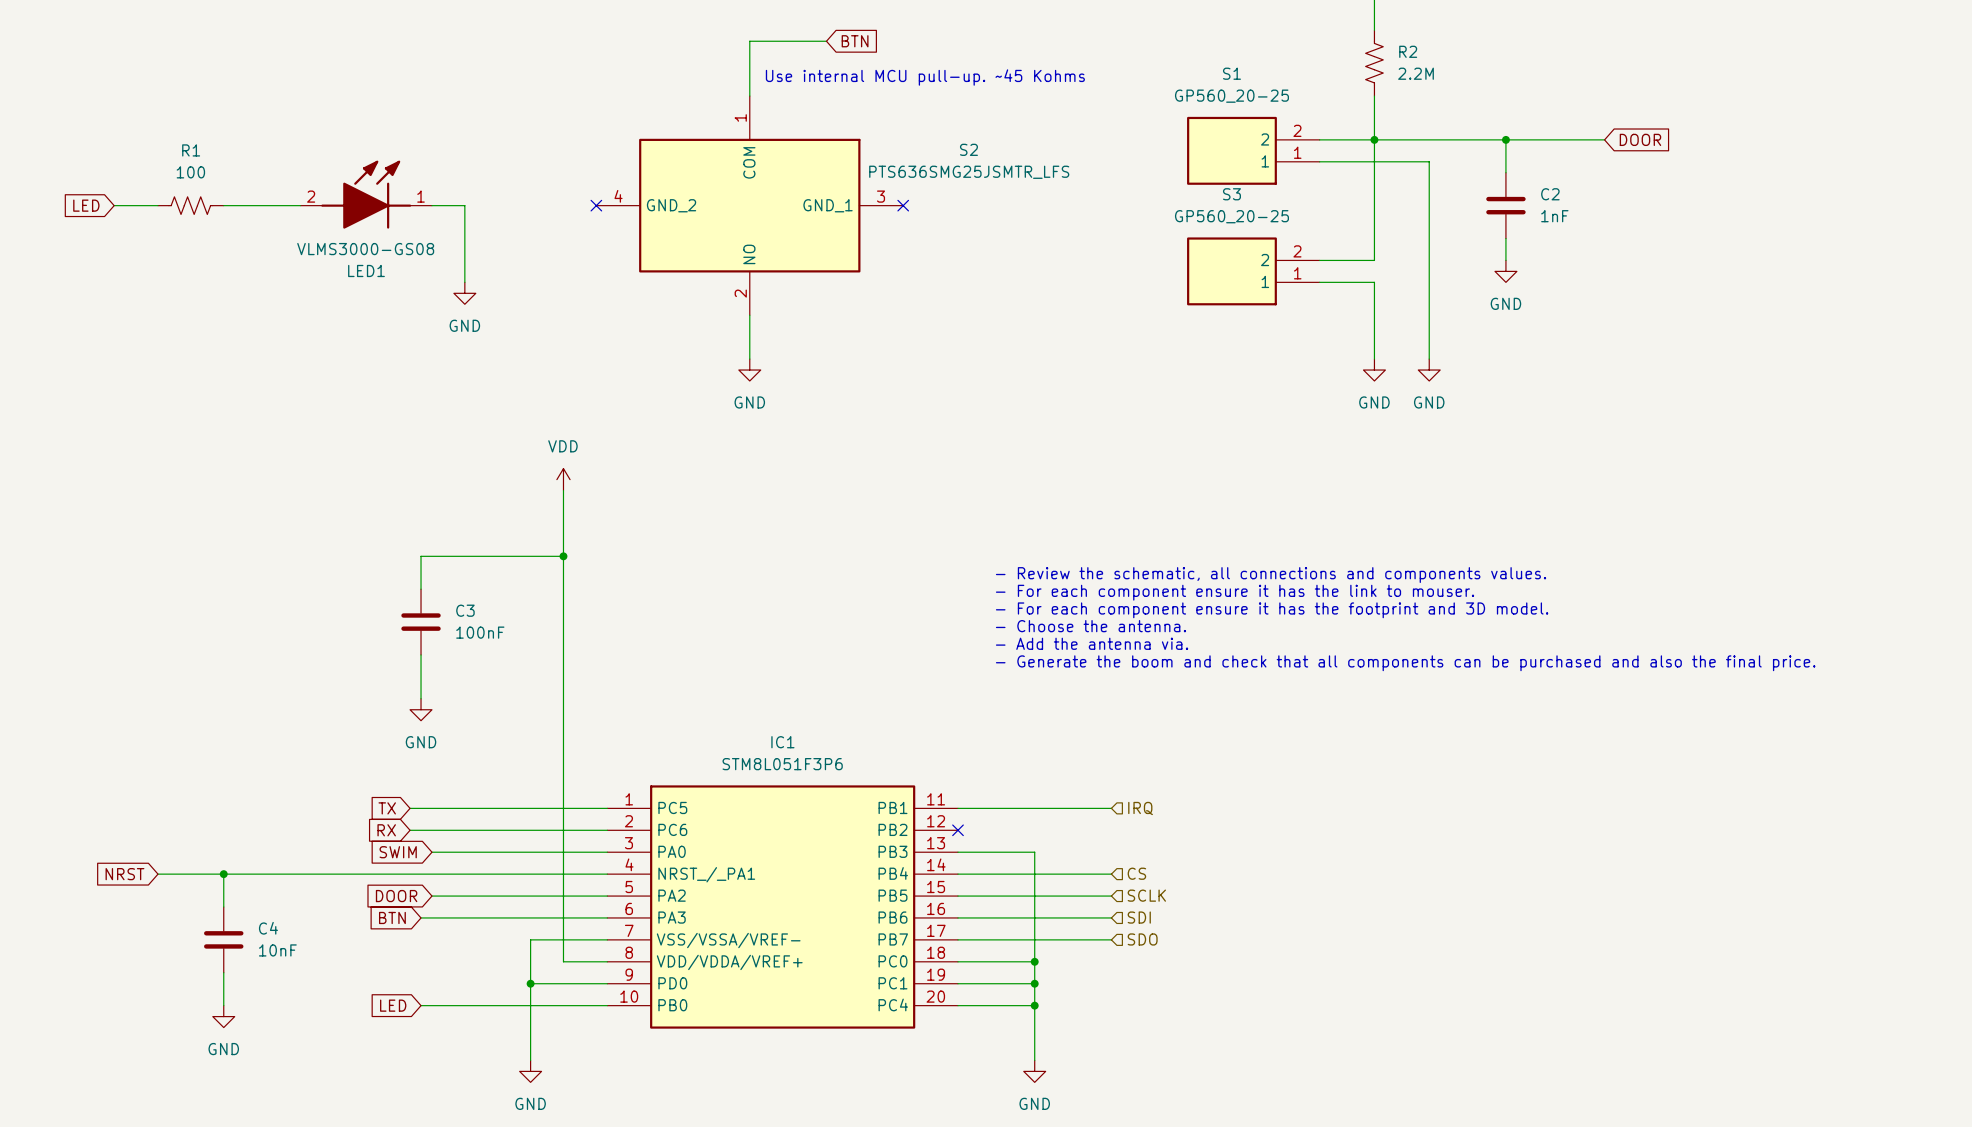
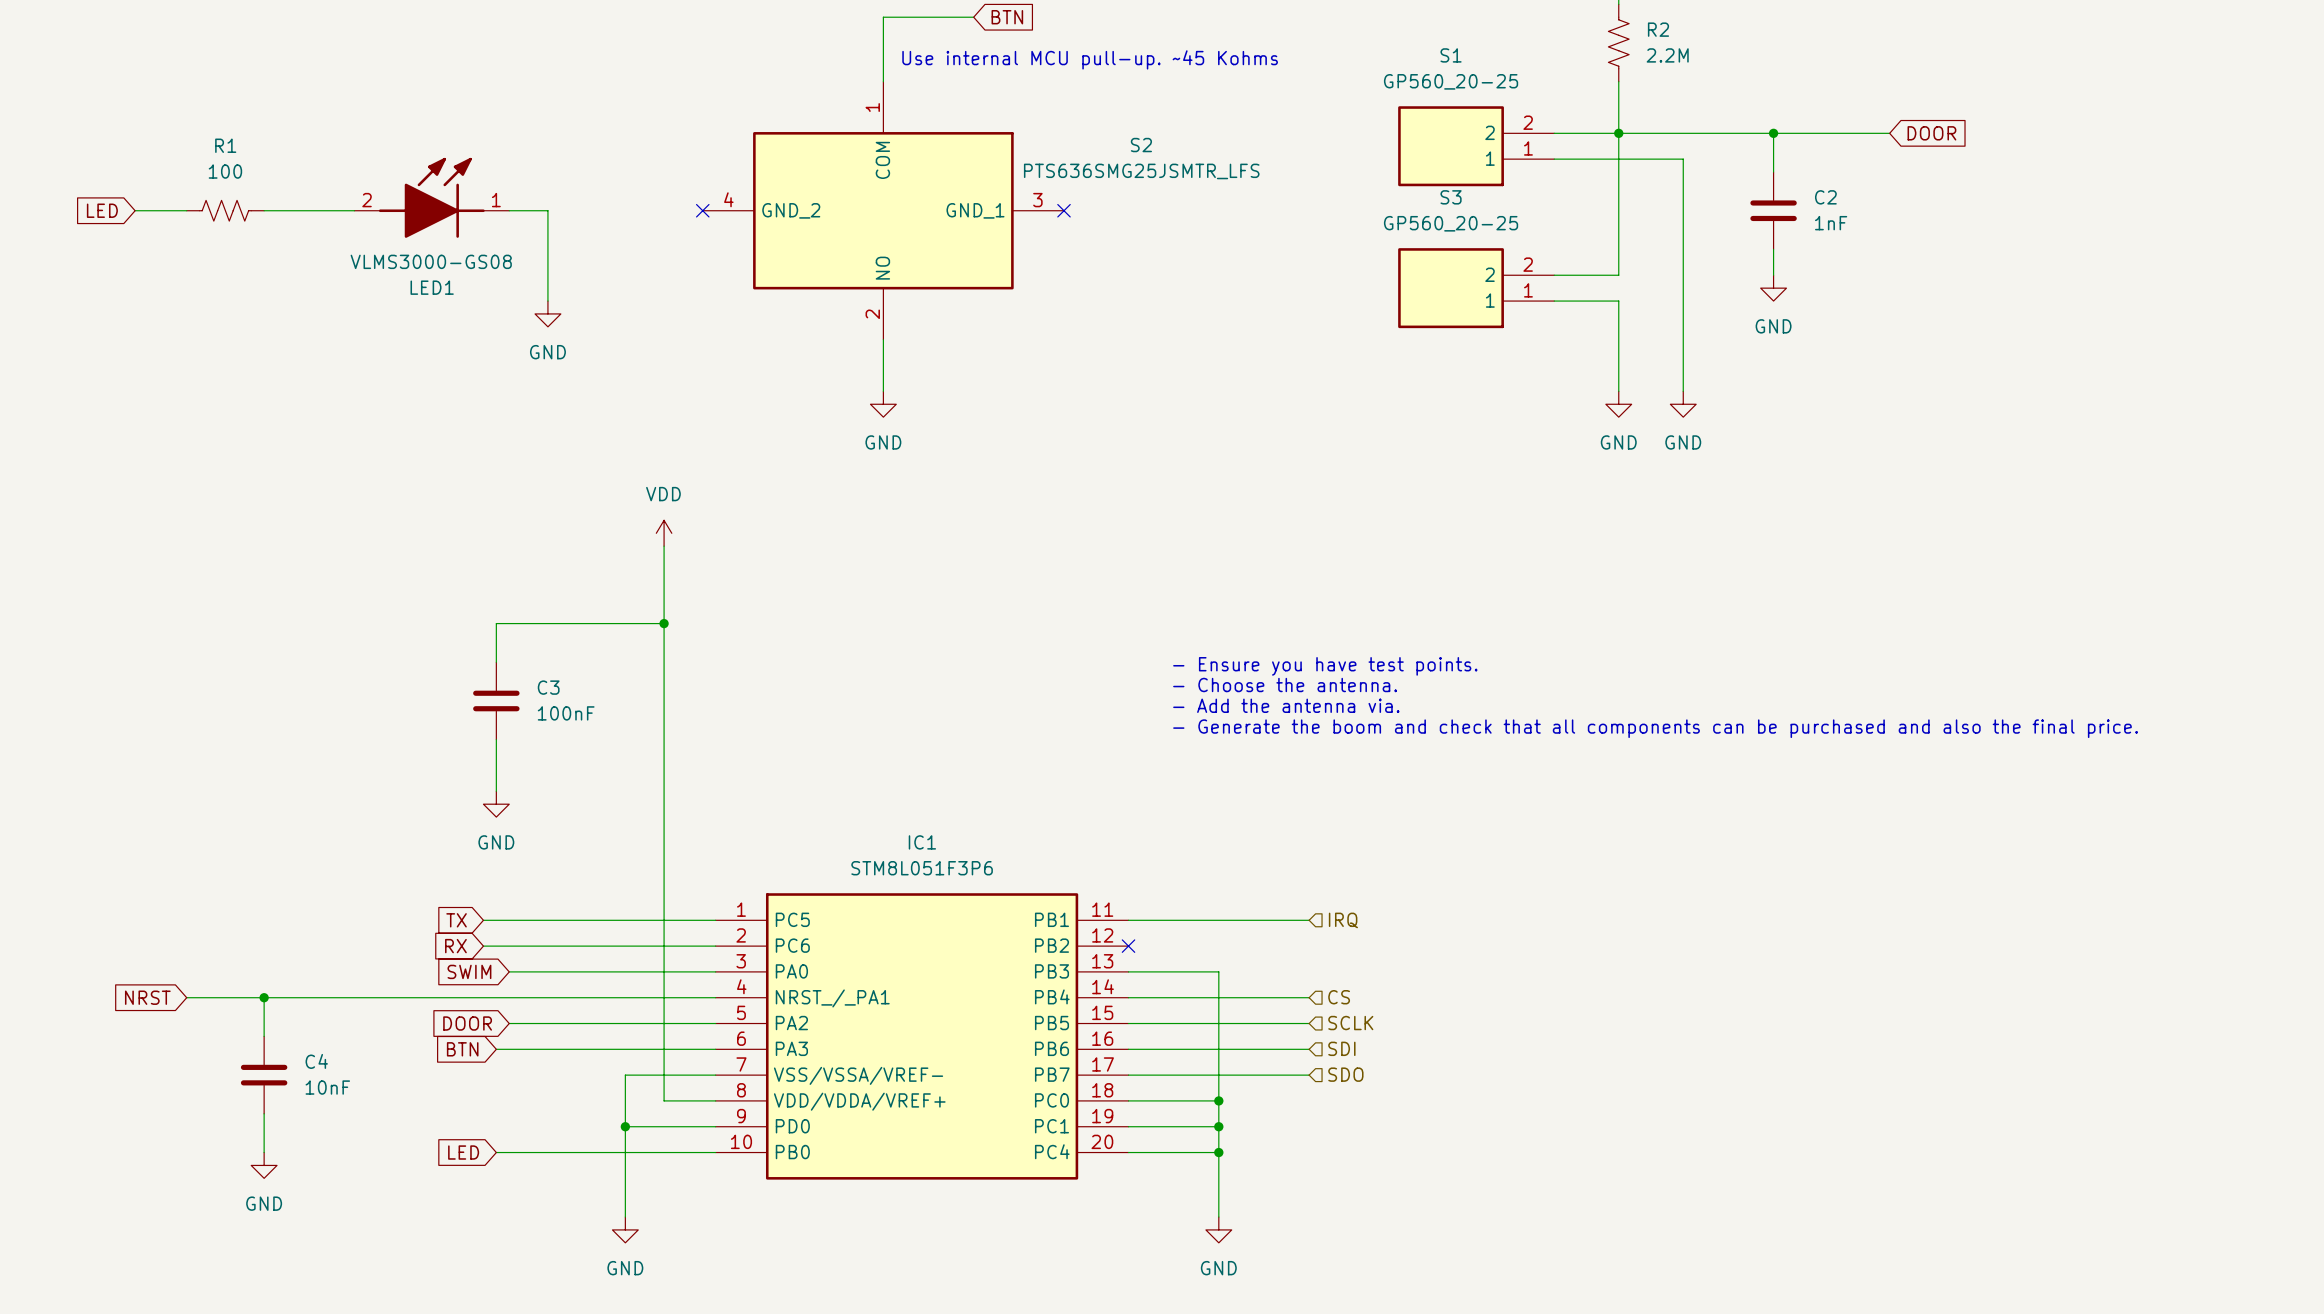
text: - Review the schematic, all connections and components values. (1271, 575) -> none
text: - For each component ensure it has the link to mouser. (1235, 592) -> - Ensure you have test points. (1325, 666)
text: - For each component ensure it has the footprint and 3D model. (1272, 610) -> - Choose the antenna. (1285, 685)
text: - Choose the antenna. (1091, 626) -> - Add the antenna via. (1286, 705)
text: - Add the antenna via. (1092, 643) -> - Generate the boom and check that all components can be purchased and also the final price. (1655, 728)
text: - Generate the boom and check that all components can be purchased and also the final price. (1405, 663) -> none

